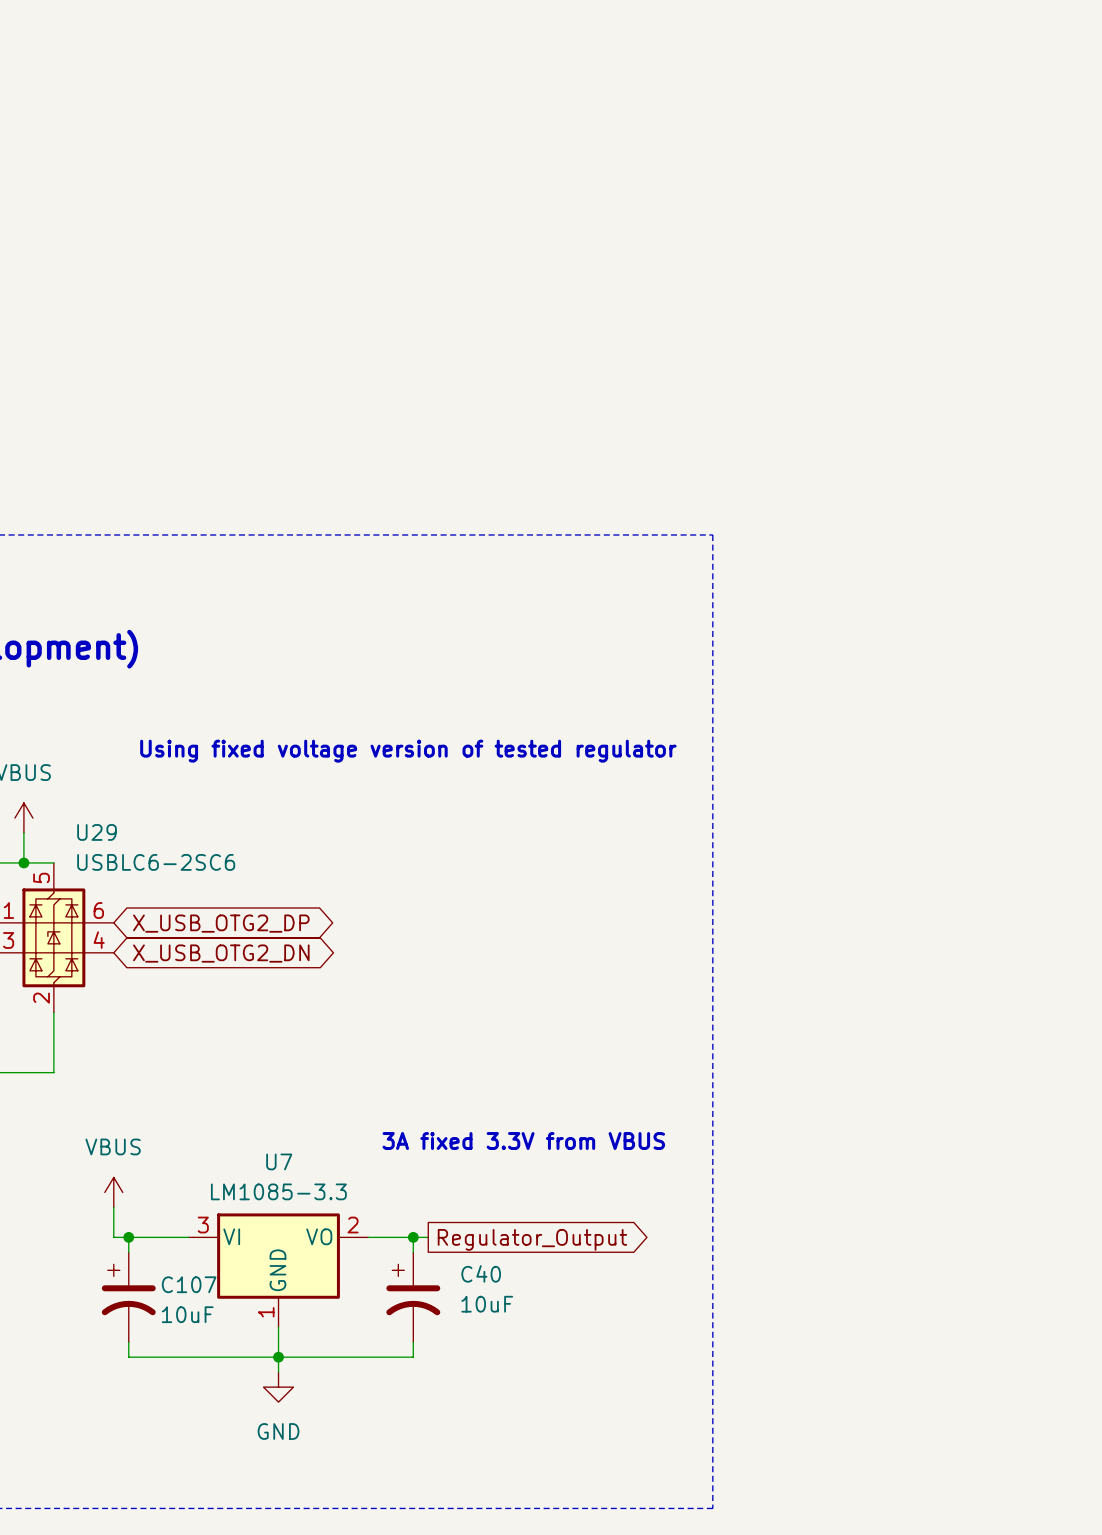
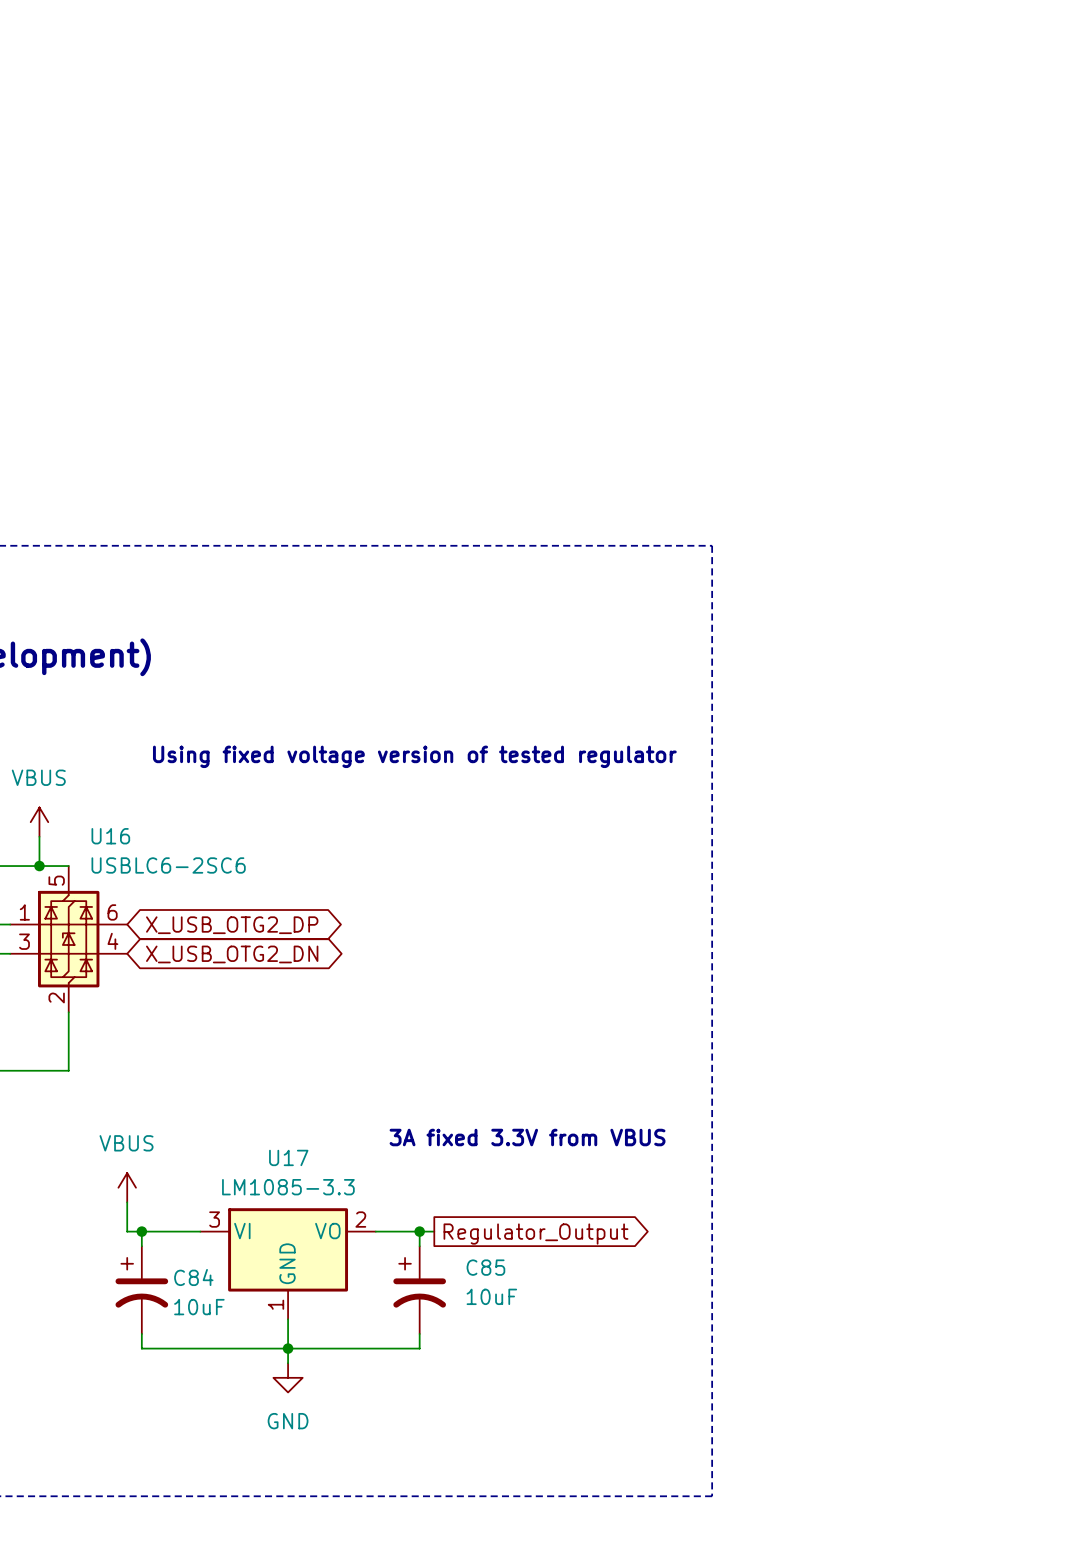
U29 name: U29 (97, 832) -> U16 (110, 836)
U7 name: U7 (279, 1161) -> U17 (288, 1157)
C40 name: C40 (481, 1273) -> C85 (485, 1267)
C107 name: C107 (189, 1284) -> C84 (193, 1277)

